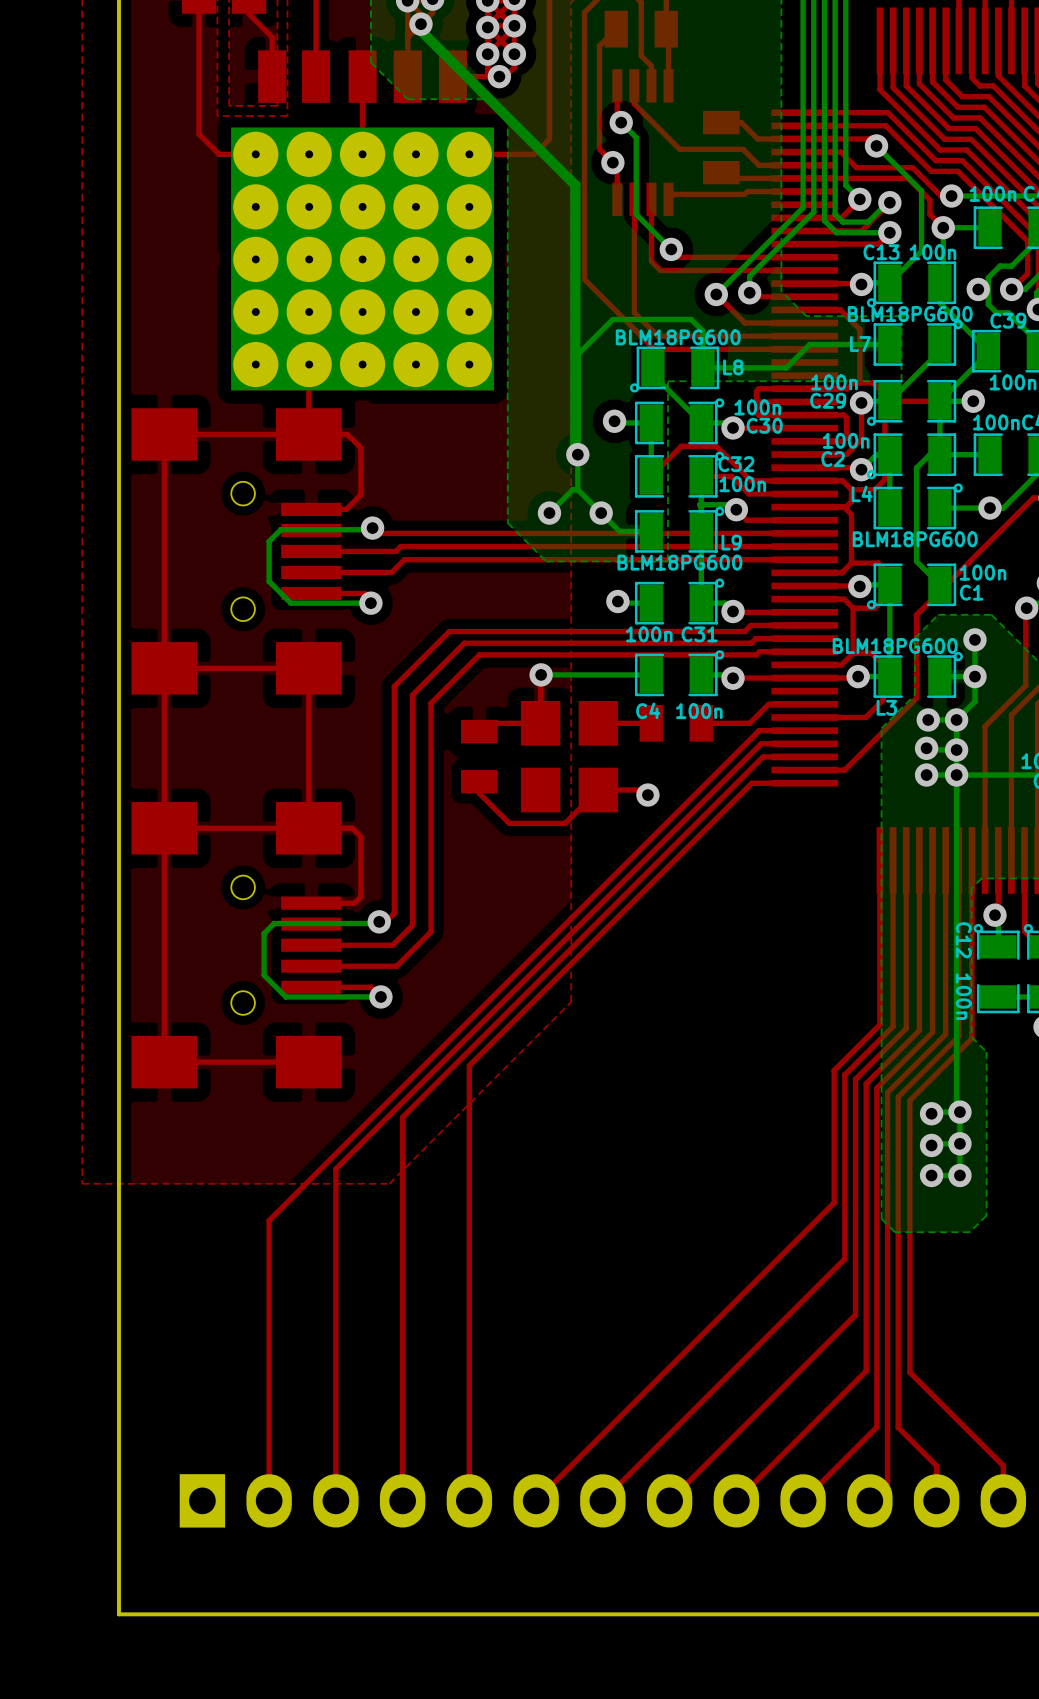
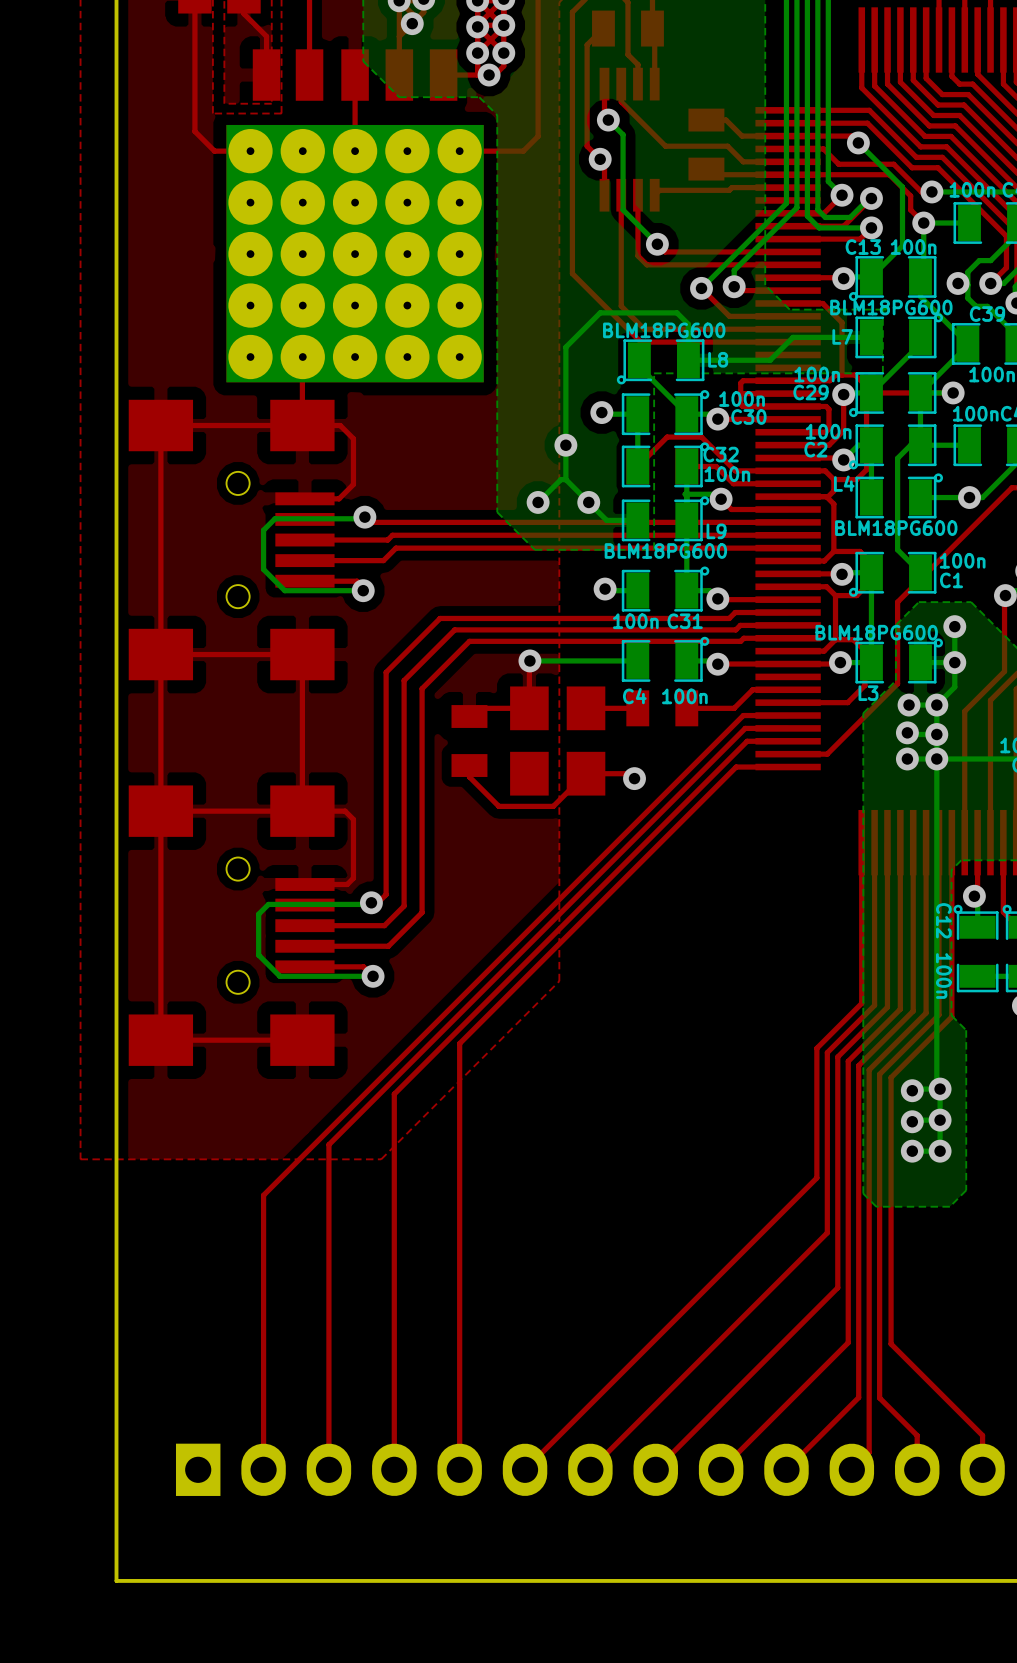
bottom track: (420, 24) (420, 34) (572, 186) (572, 446) (577, 451) -> none
bottom track: (420, 27) (577, 184) (577, 354) -> none

